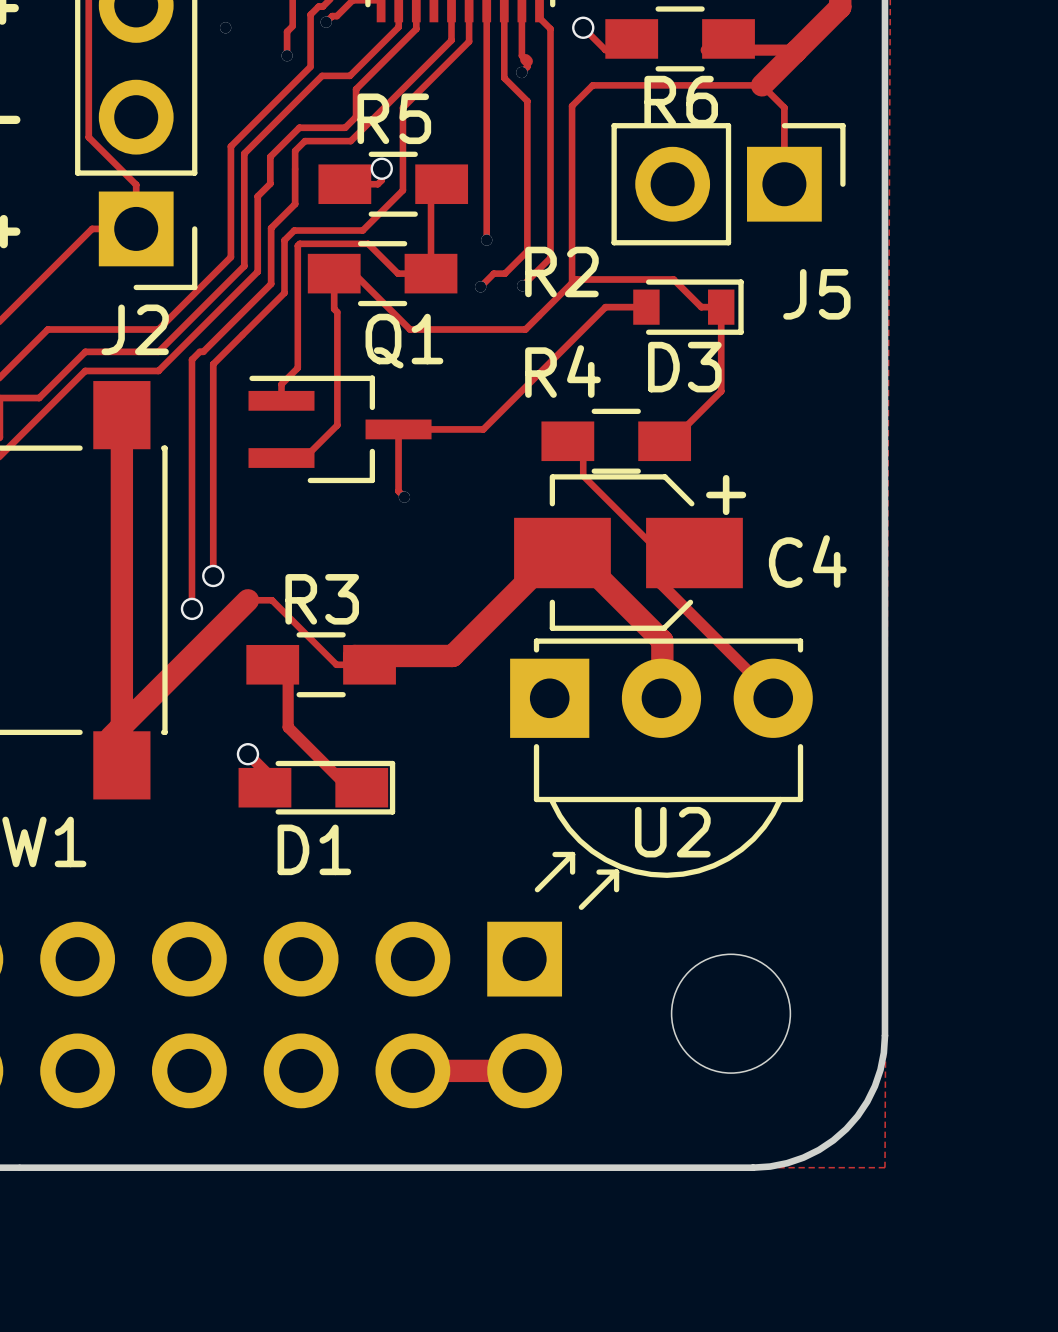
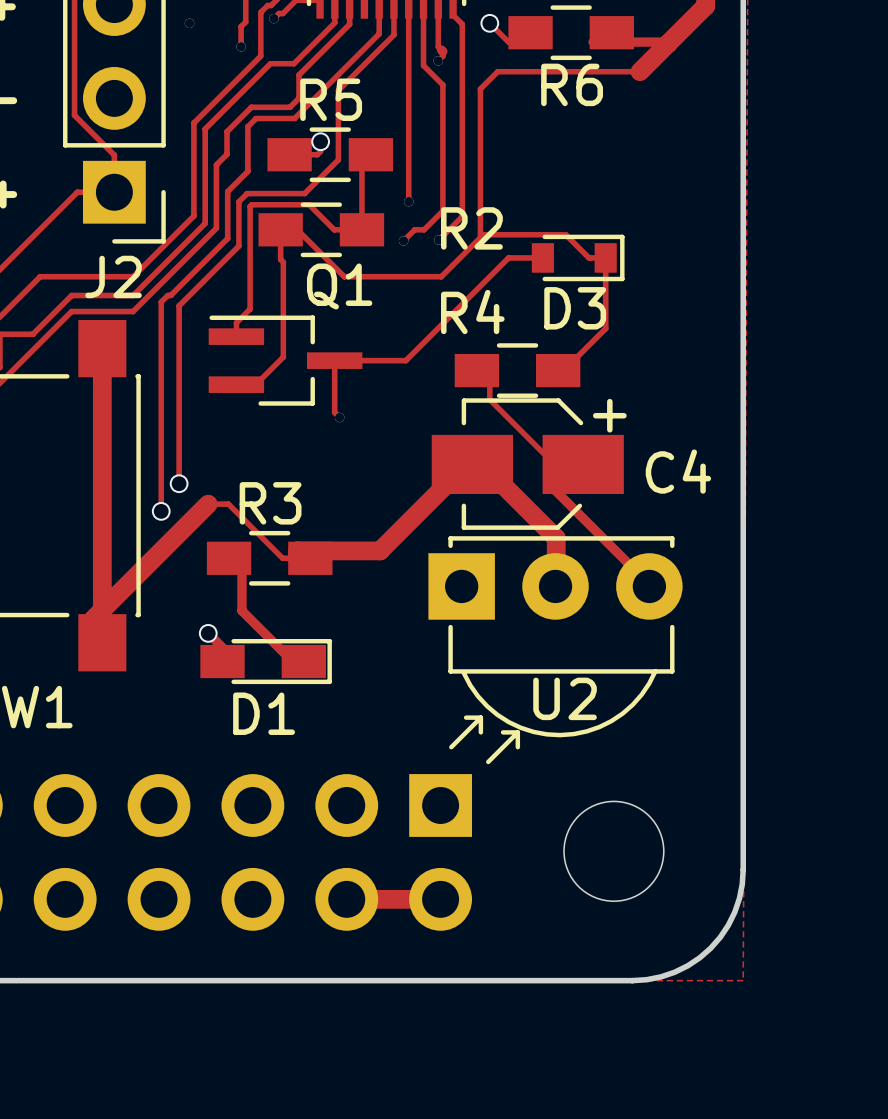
track: (762, 85) (784, 107) (784, 184) -> none
J5: (728, 184) -> none

